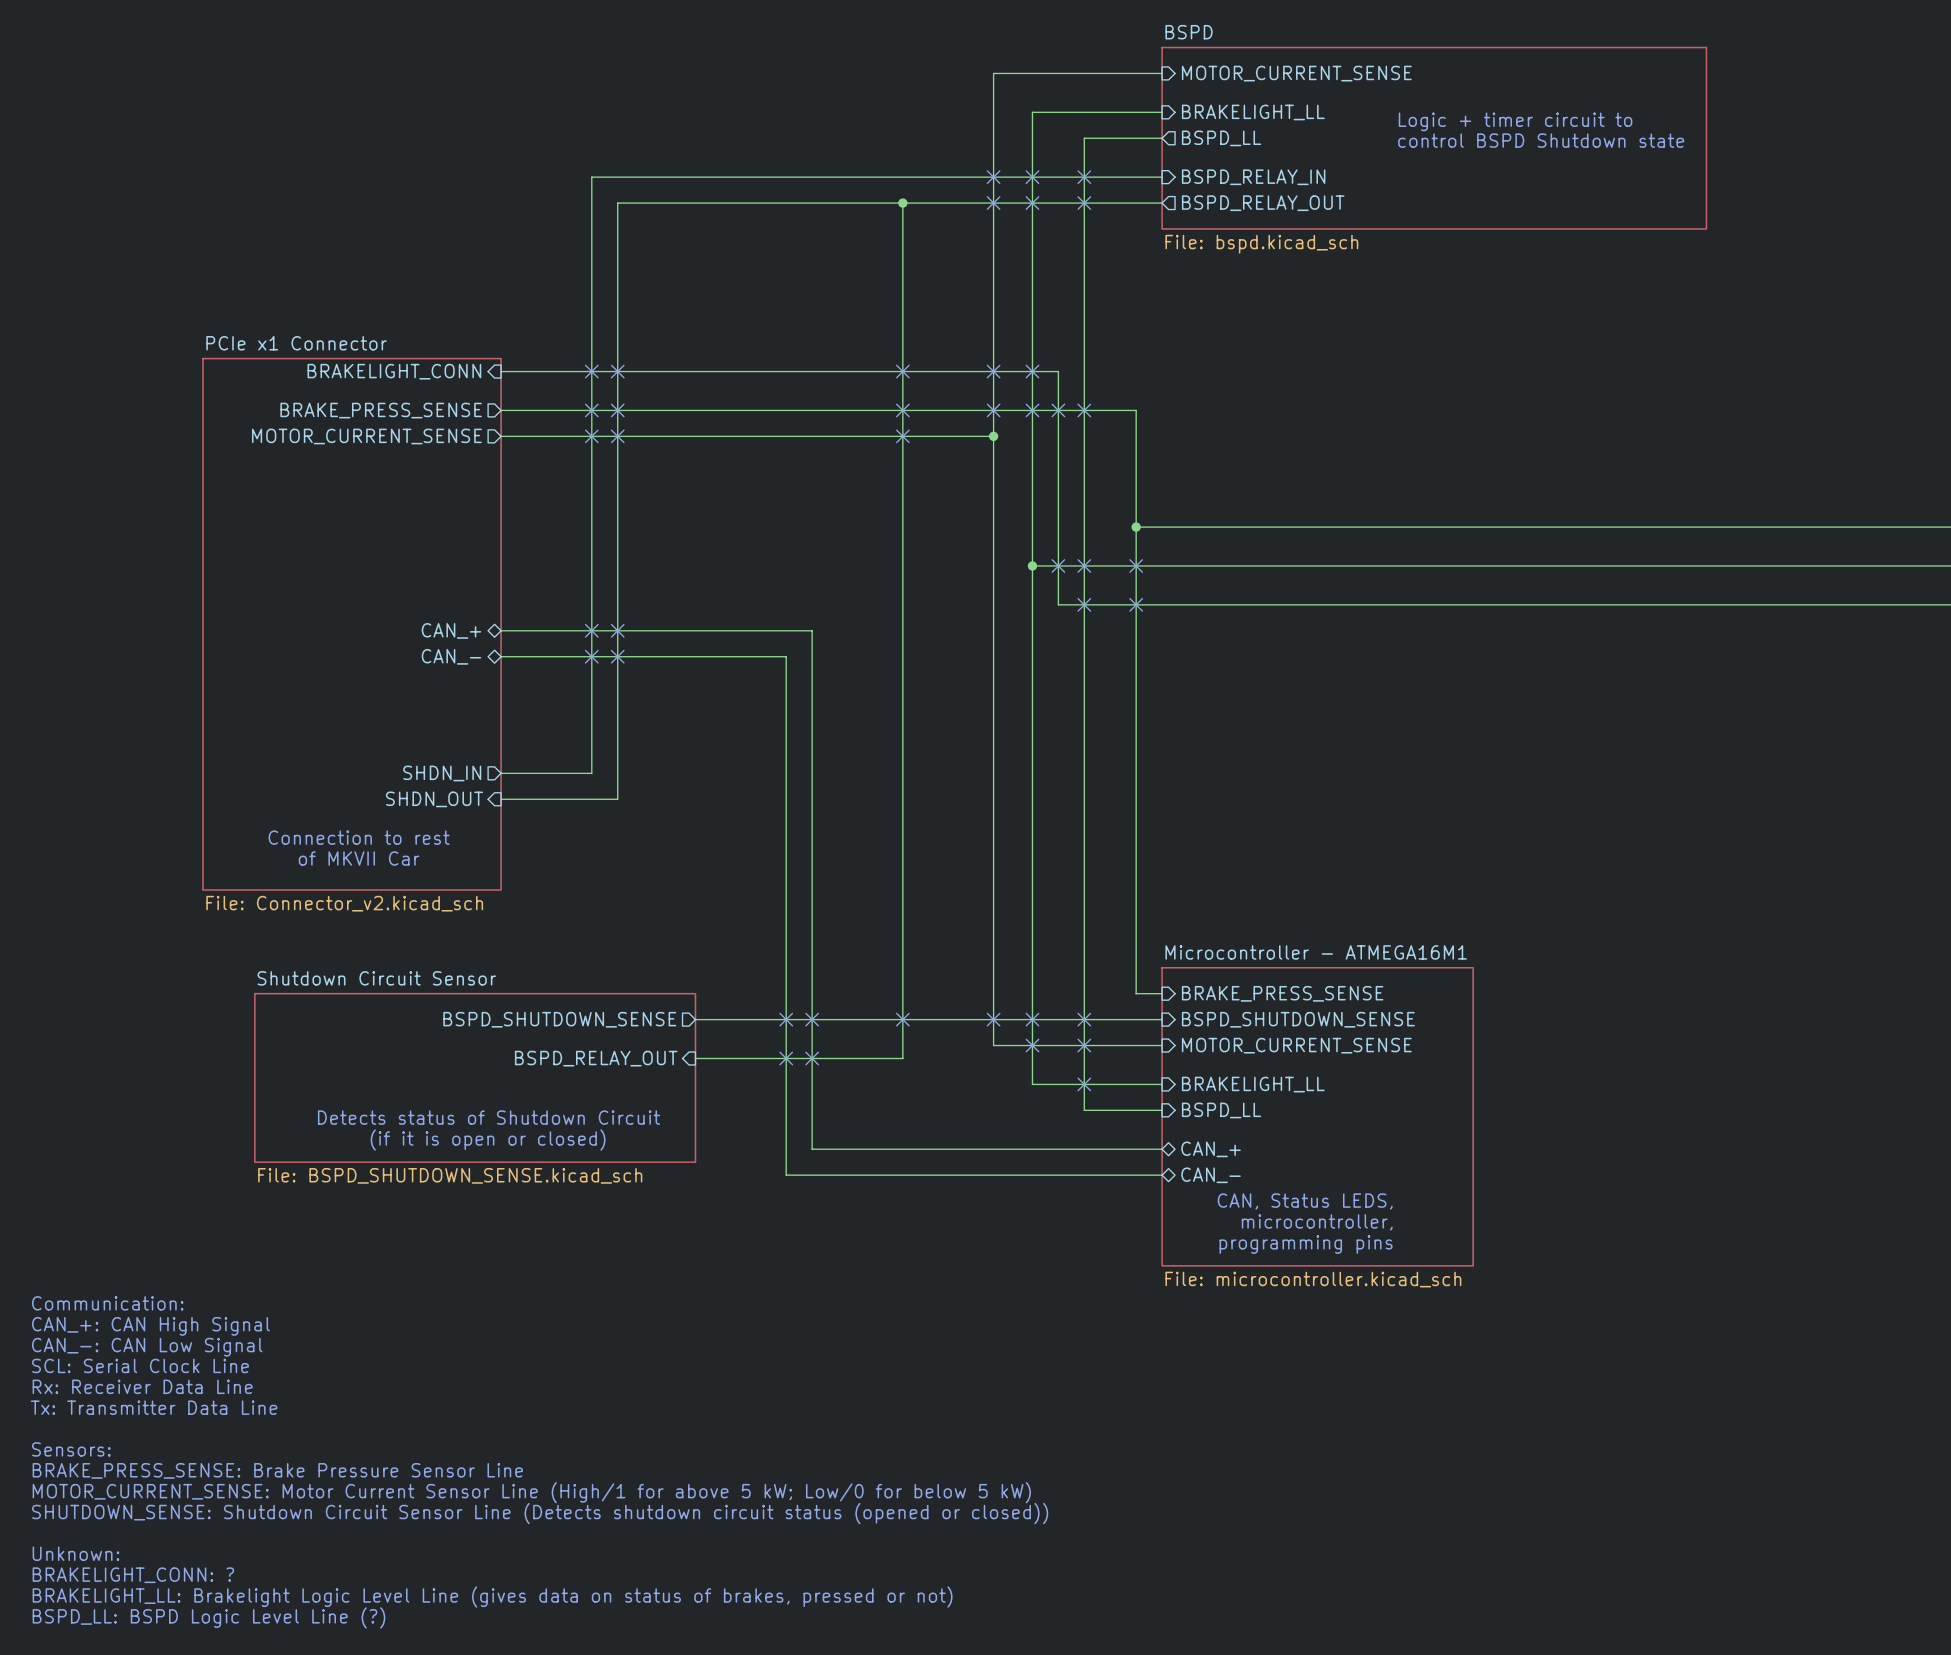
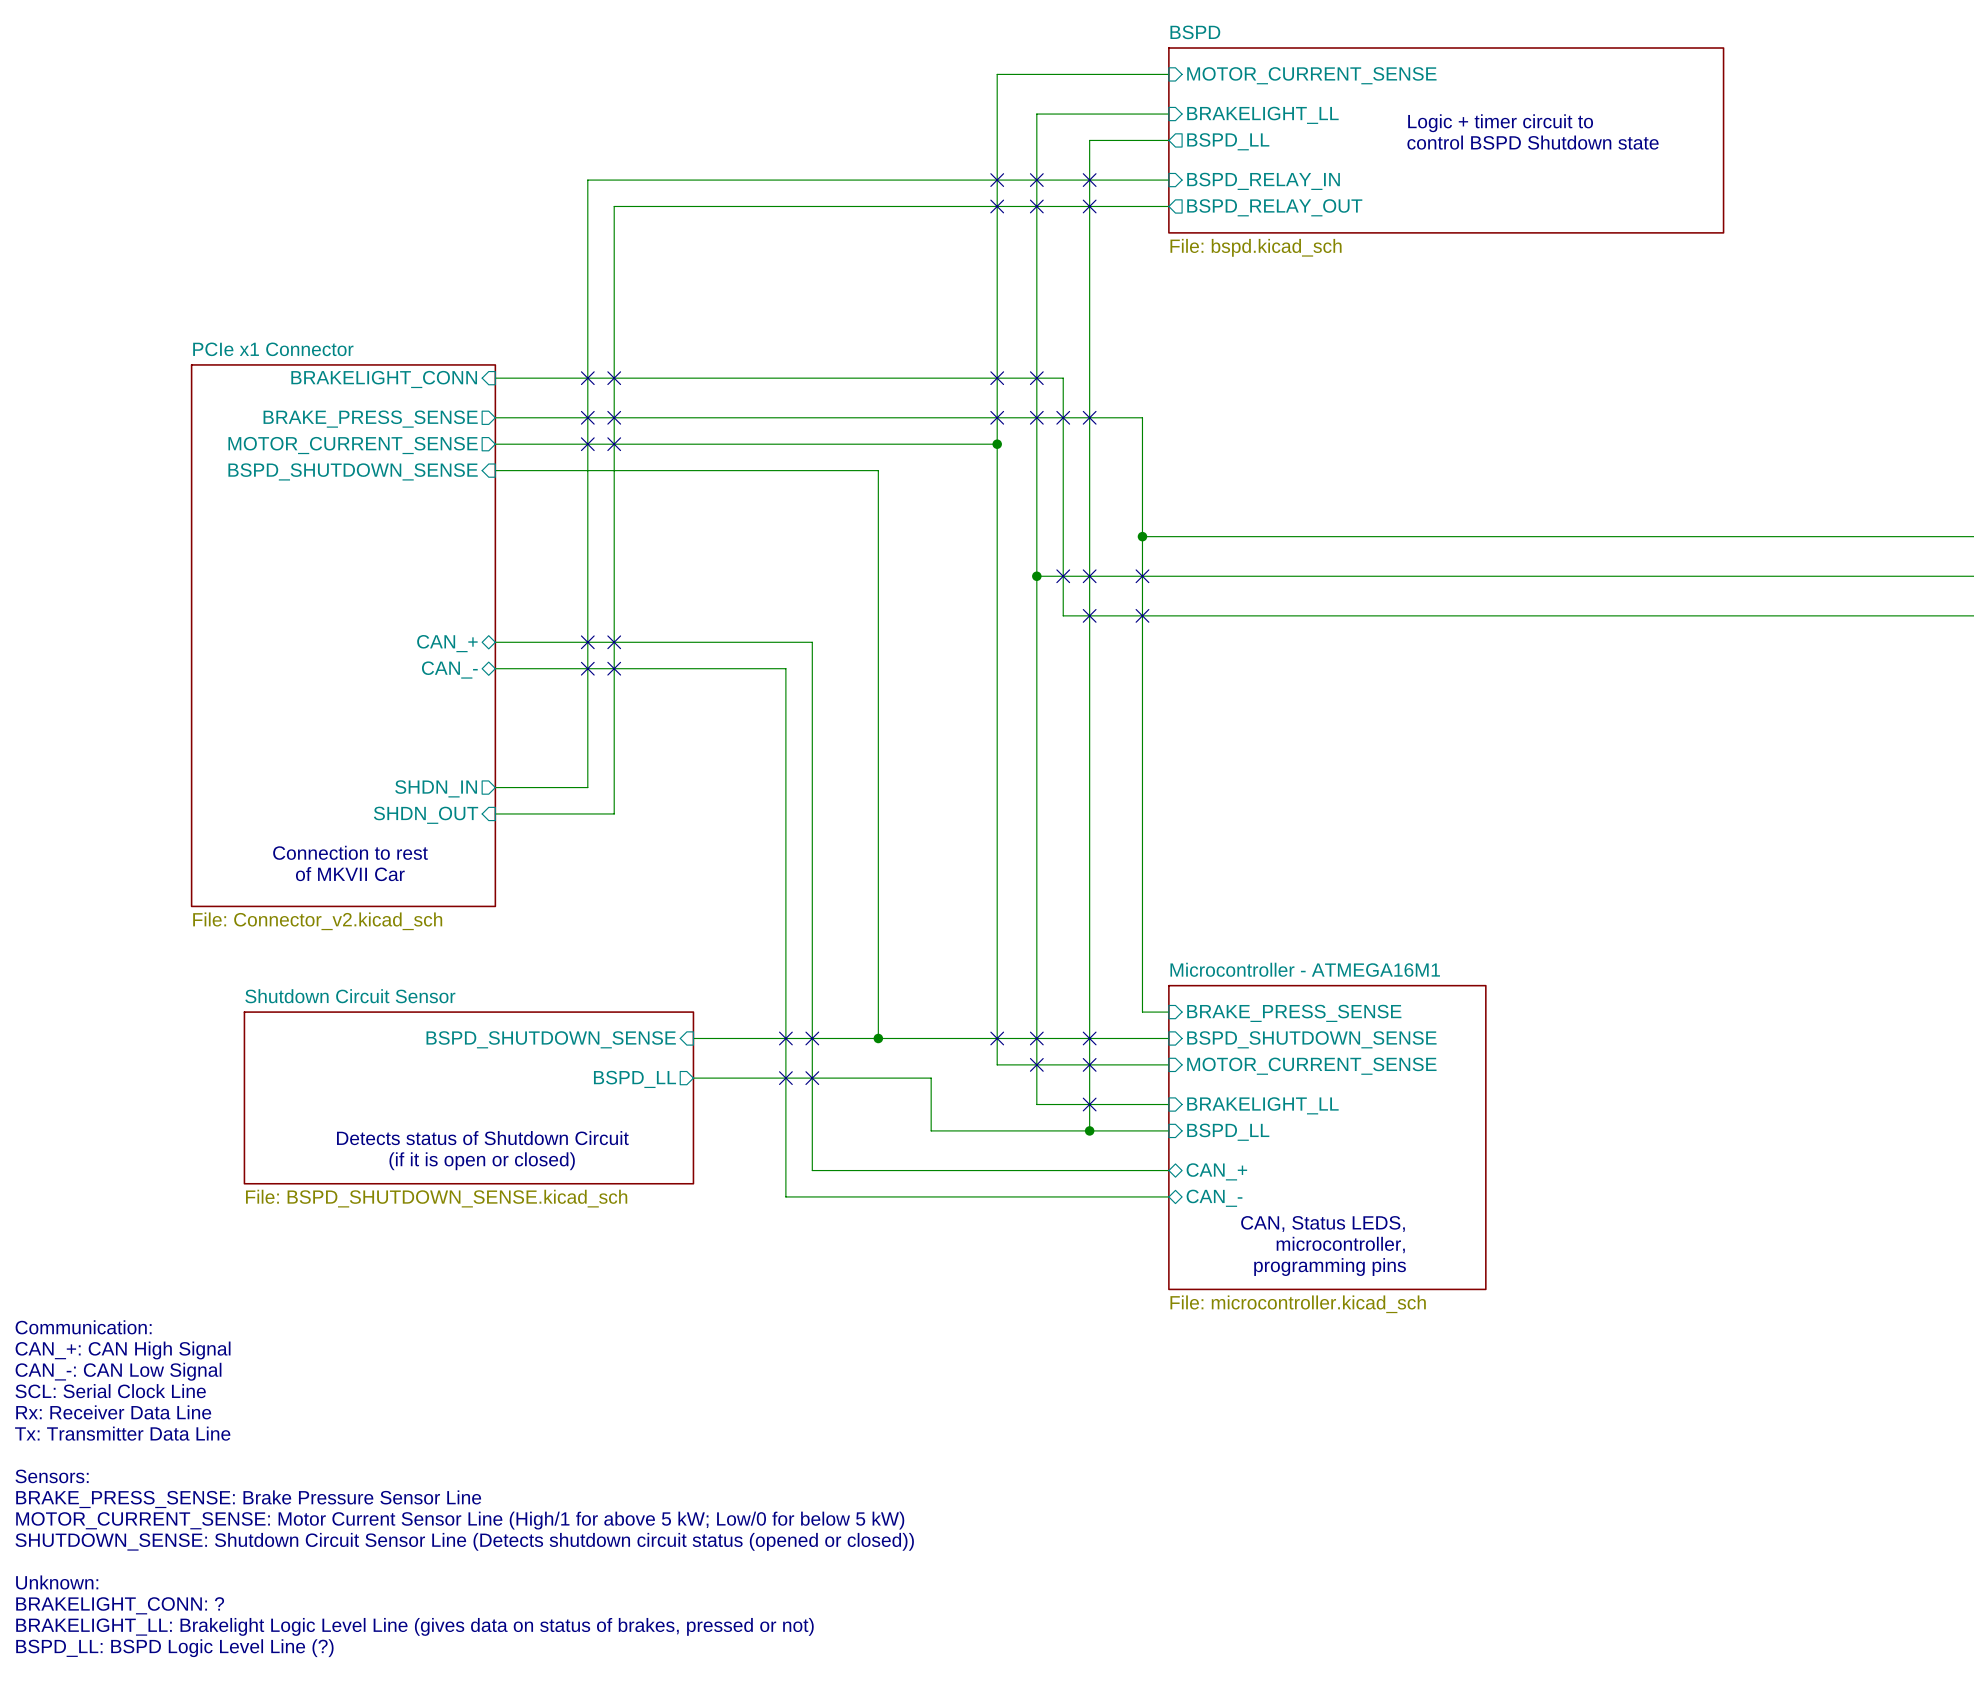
wire: (902, 203) (902, 1058) -> (1089, 1130) (931, 1130) (931, 1078) (904, 1078)
junction: (902, 203) -> none
no-connect mark: (902, 371) -> none
no-connect mark: (902, 410) -> none
no-connect mark: (902, 436) -> none
sheet pin: none -> BSPD_SHUTDOWN_SENSE (353, 471)
wire: none -> (495, 470) (878, 470) (878, 1038)
sheet pin shape: output (559, 1019) -> input (551, 1039)
junction: none -> (878, 1038)
no-connect mark: (902, 1019) -> none
sheet pin shape: input (596, 1058) -> output (635, 1079)
sheet pin: BSPD_RELAY_OUT (596, 1058) -> BSPD_LL (635, 1079)
junction: none -> (1089, 1130)

